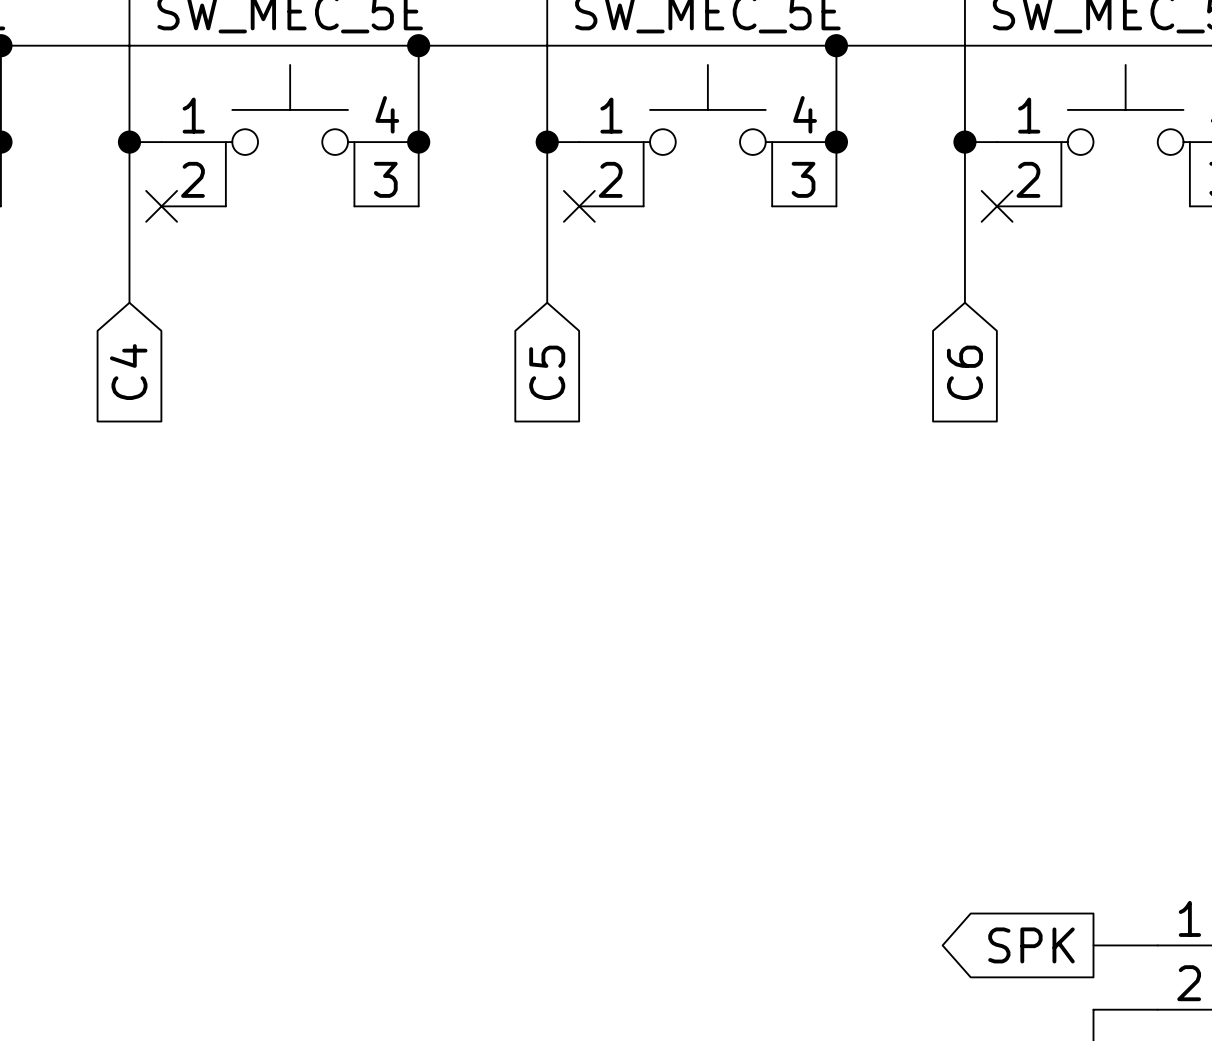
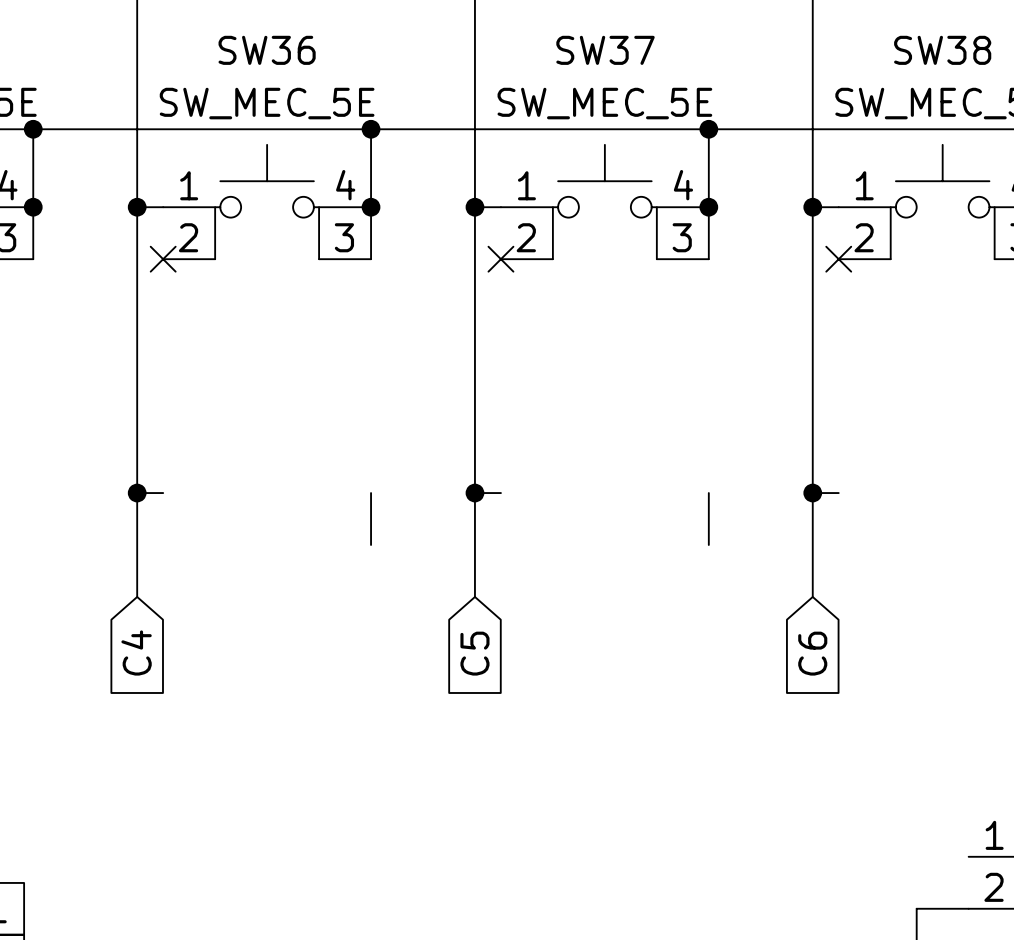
wire: none -> (137, 337) (137, 596)
wire: none -> (474, 337) (474, 596)
wire: none -> (812, 337) (812, 596)
global label position: C4 (128, 372) -> C4 (136, 653)
global label position: C5 (547, 372) -> C5 (474, 653)
global label position: C6 (964, 372) -> C6 (812, 653)
wire: none -> (137, 493) (163, 493)
junction: none -> (137, 493)
wire: none -> (371, 493) (371, 545)
wire: none -> (474, 493) (500, 493)
junction: none -> (474, 493)
wire: none -> (708, 493) (708, 545)
wire: none -> (812, 493) (838, 493)
junction: none -> (812, 493)
global label: SPK (1031, 945) -> none
wire: (1093, 945) (1157, 945) -> none

